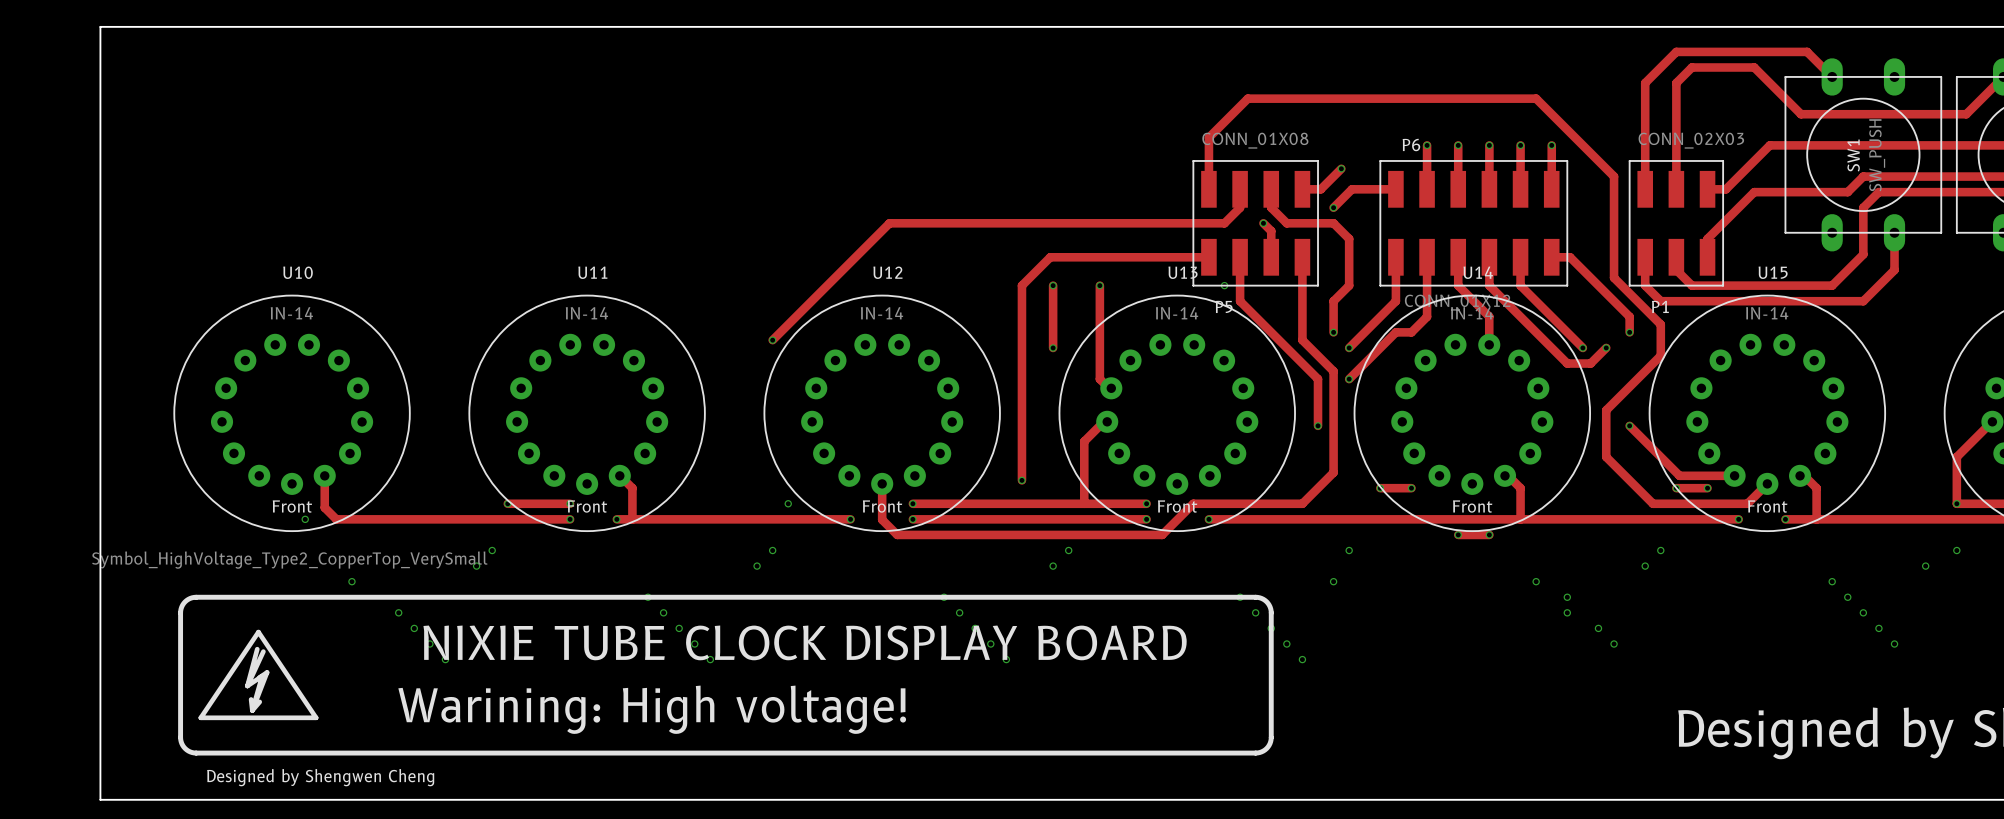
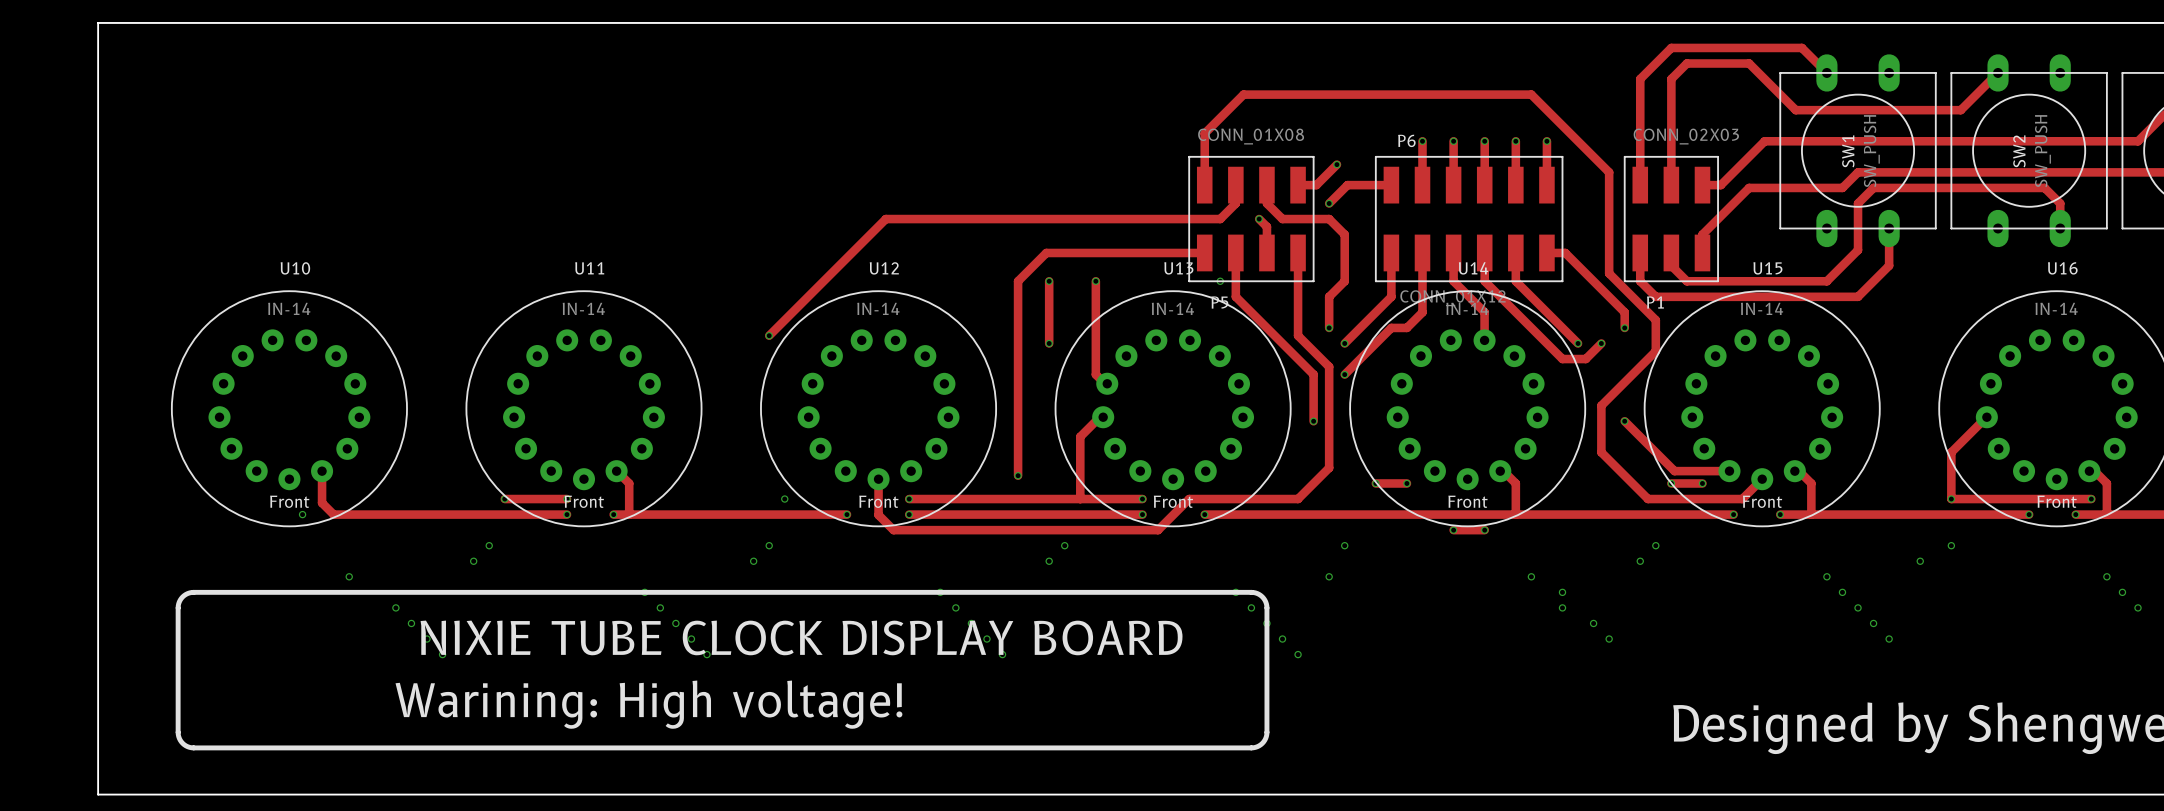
Designed by Shengwen Cheng: Symbol_HighVoltage_Type2_CopperTop_VerySmall (258, 674) -> none

